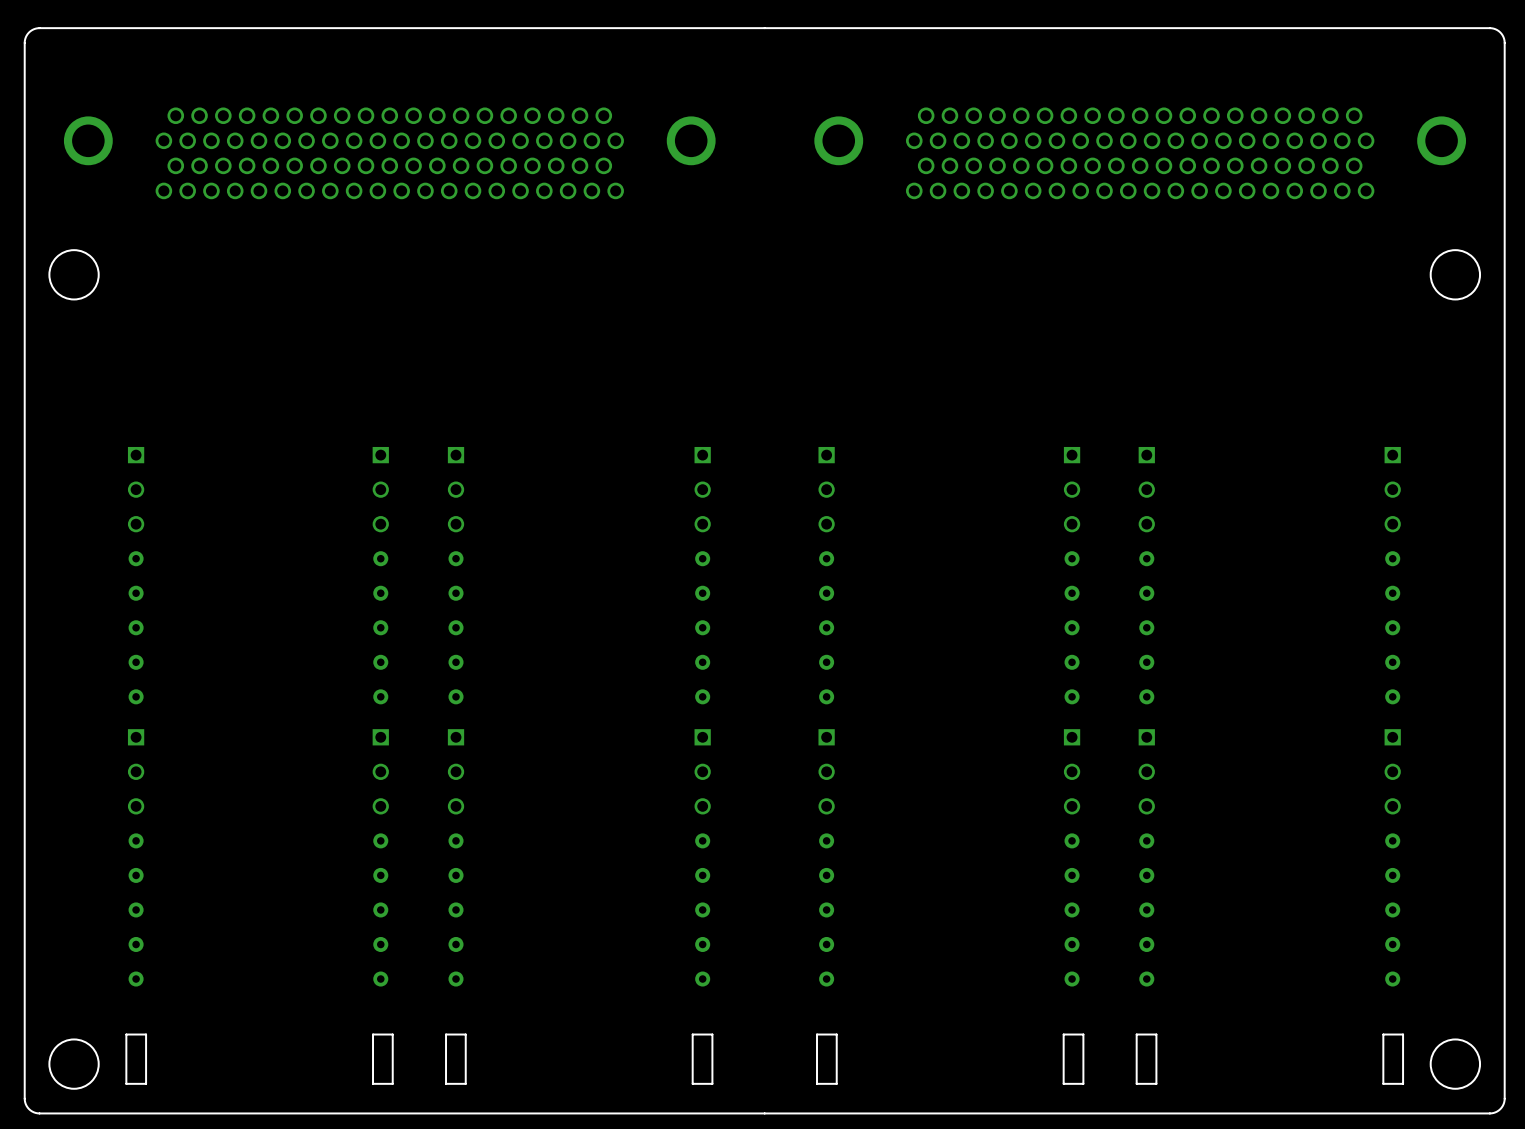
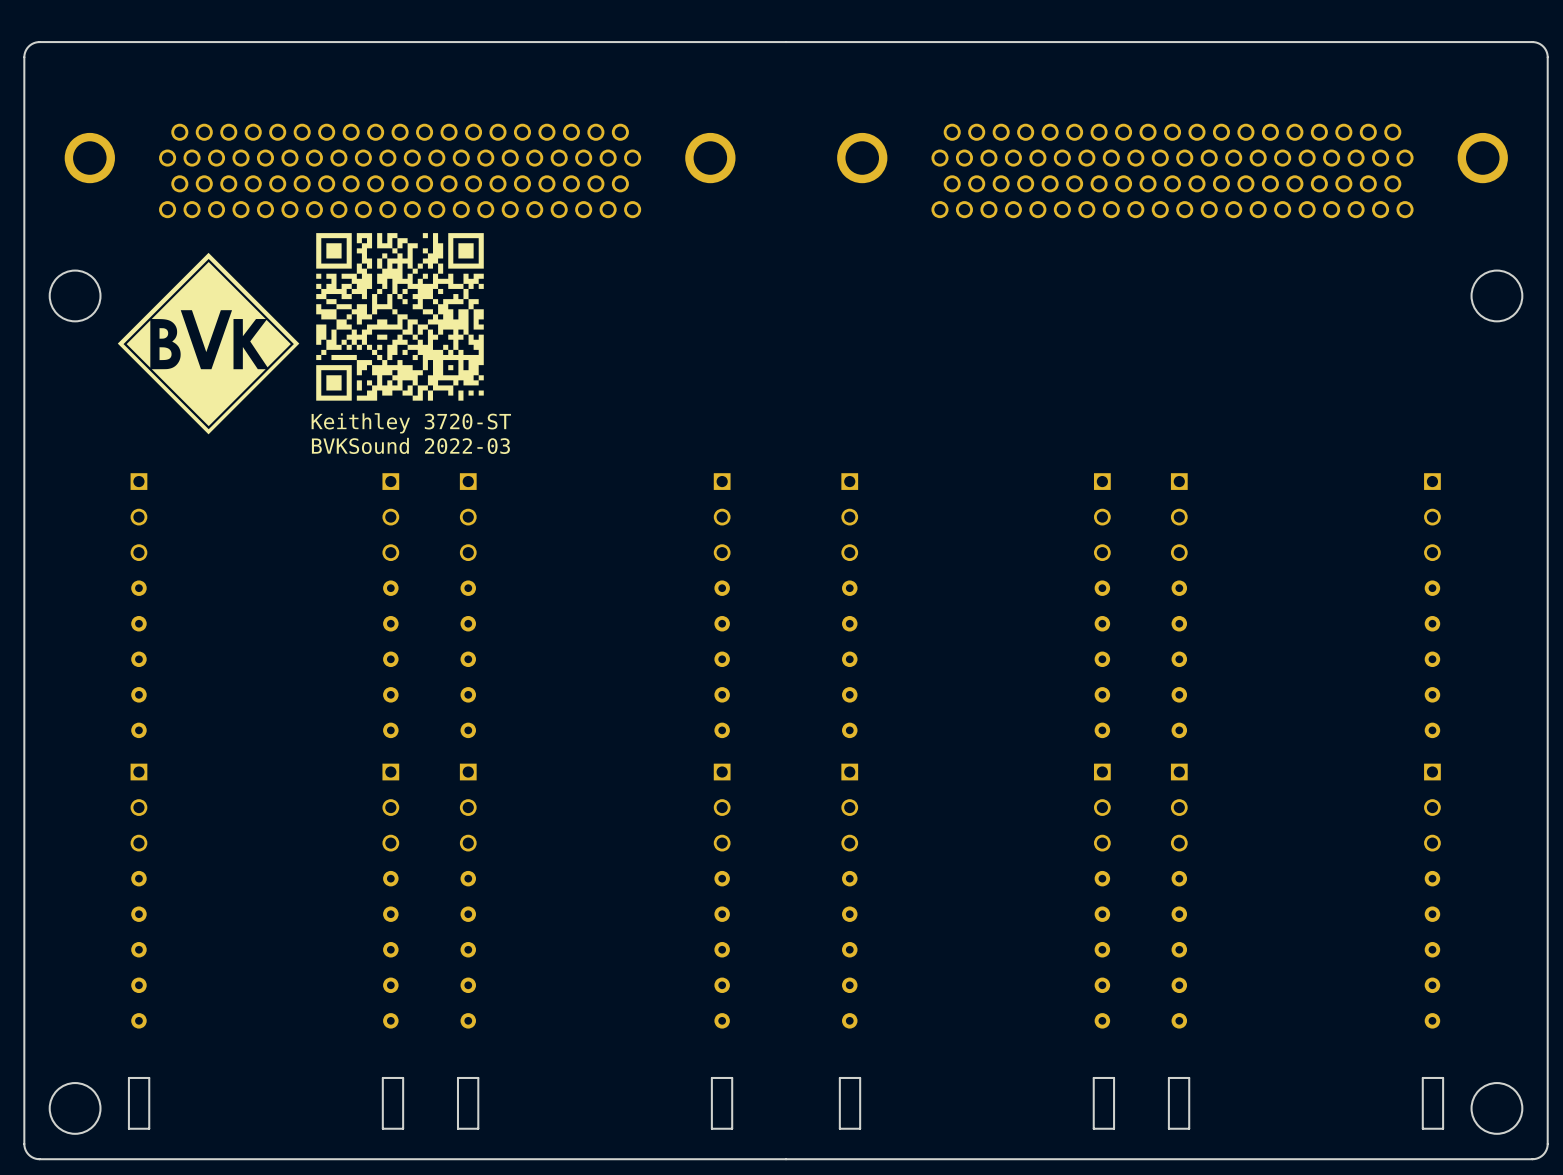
drawing: none -> [316, 233, 484, 401]
drawing: none -> [117, 252, 300, 435]
text: none -> Keithley 3720-ST (411, 423)
text: none -> BVKSound 2022-03 (410, 445)

